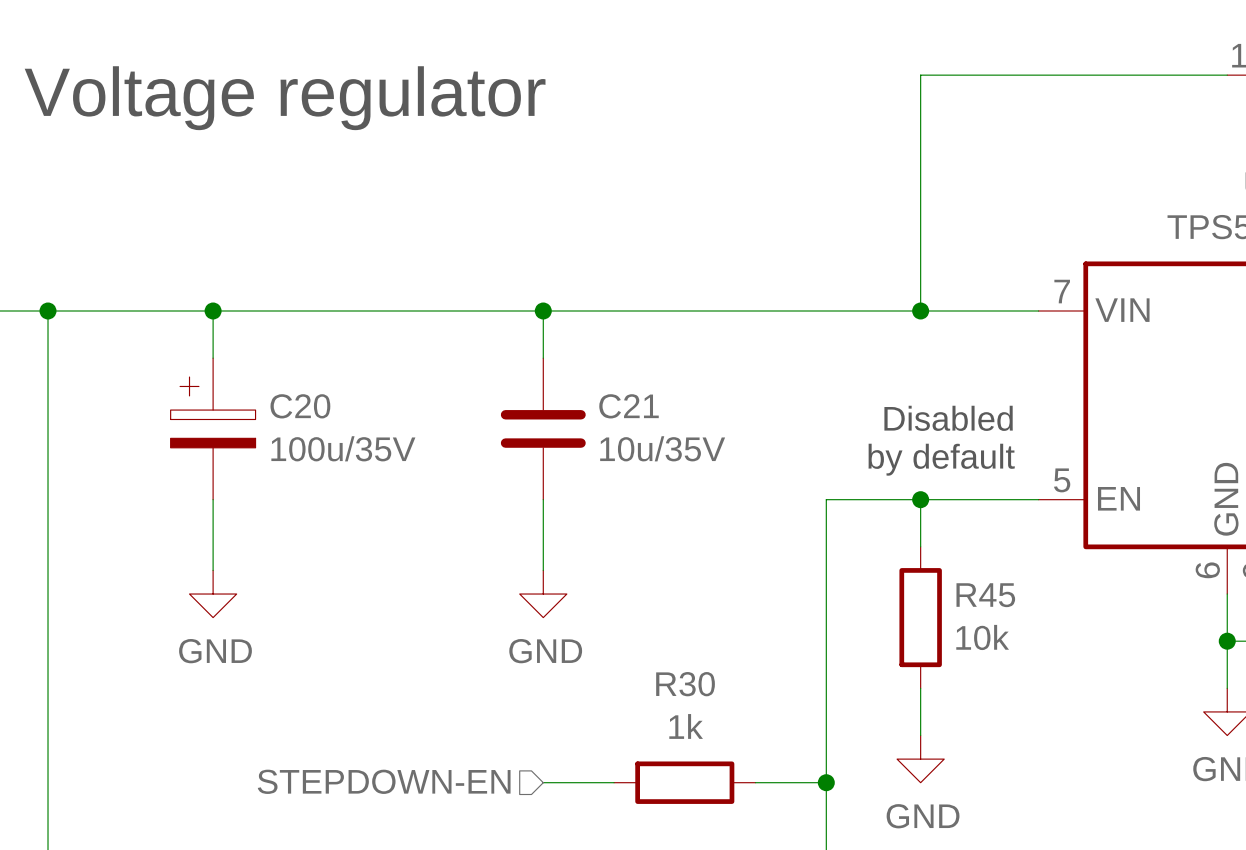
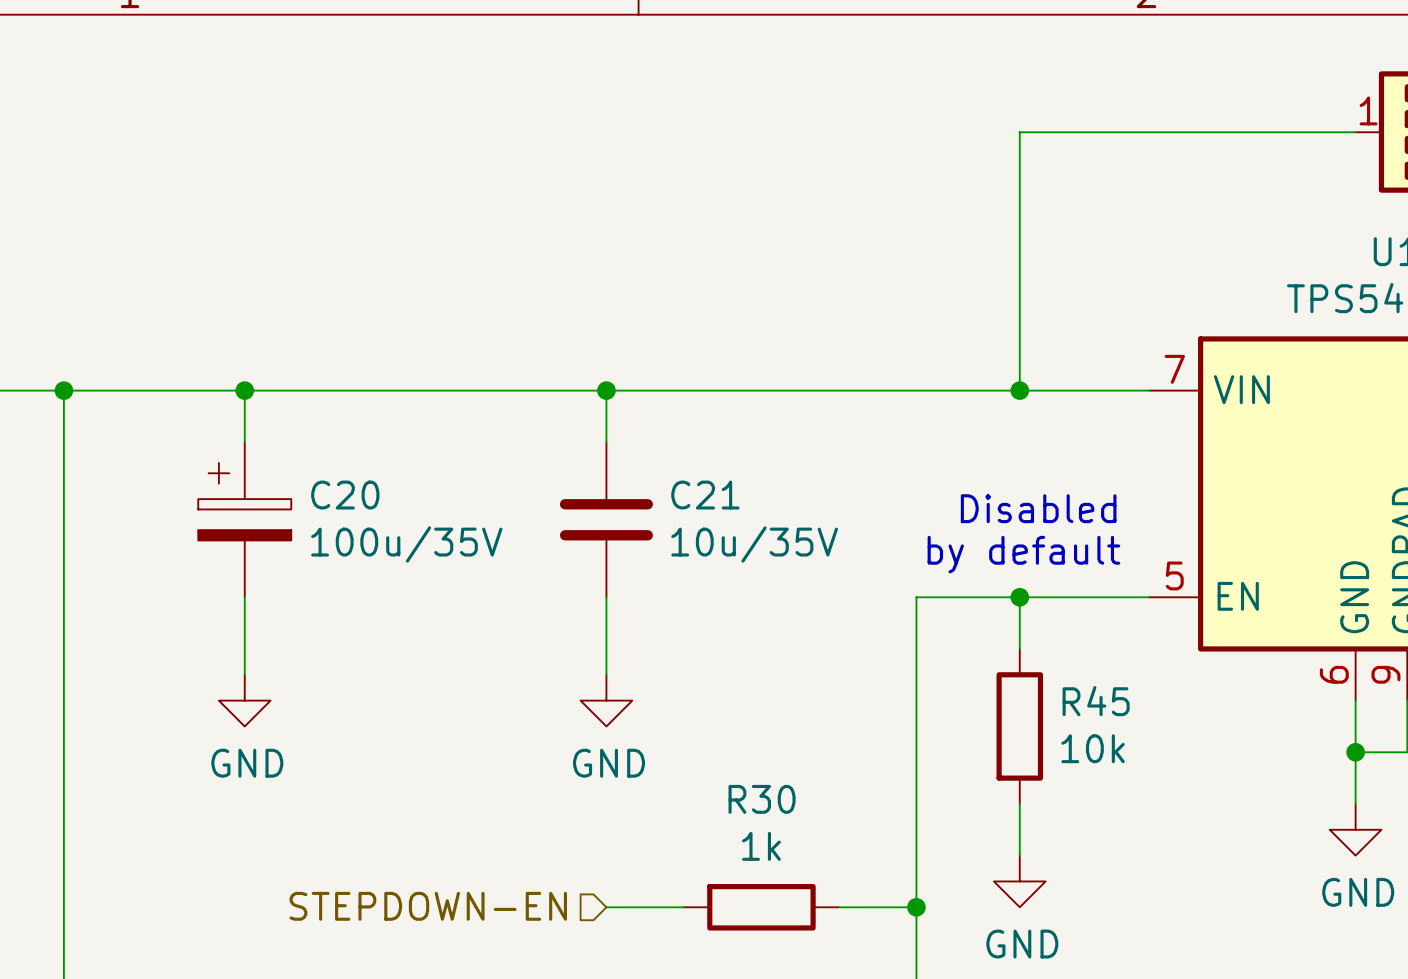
text: Voltage regulator (285, 98) -> none

